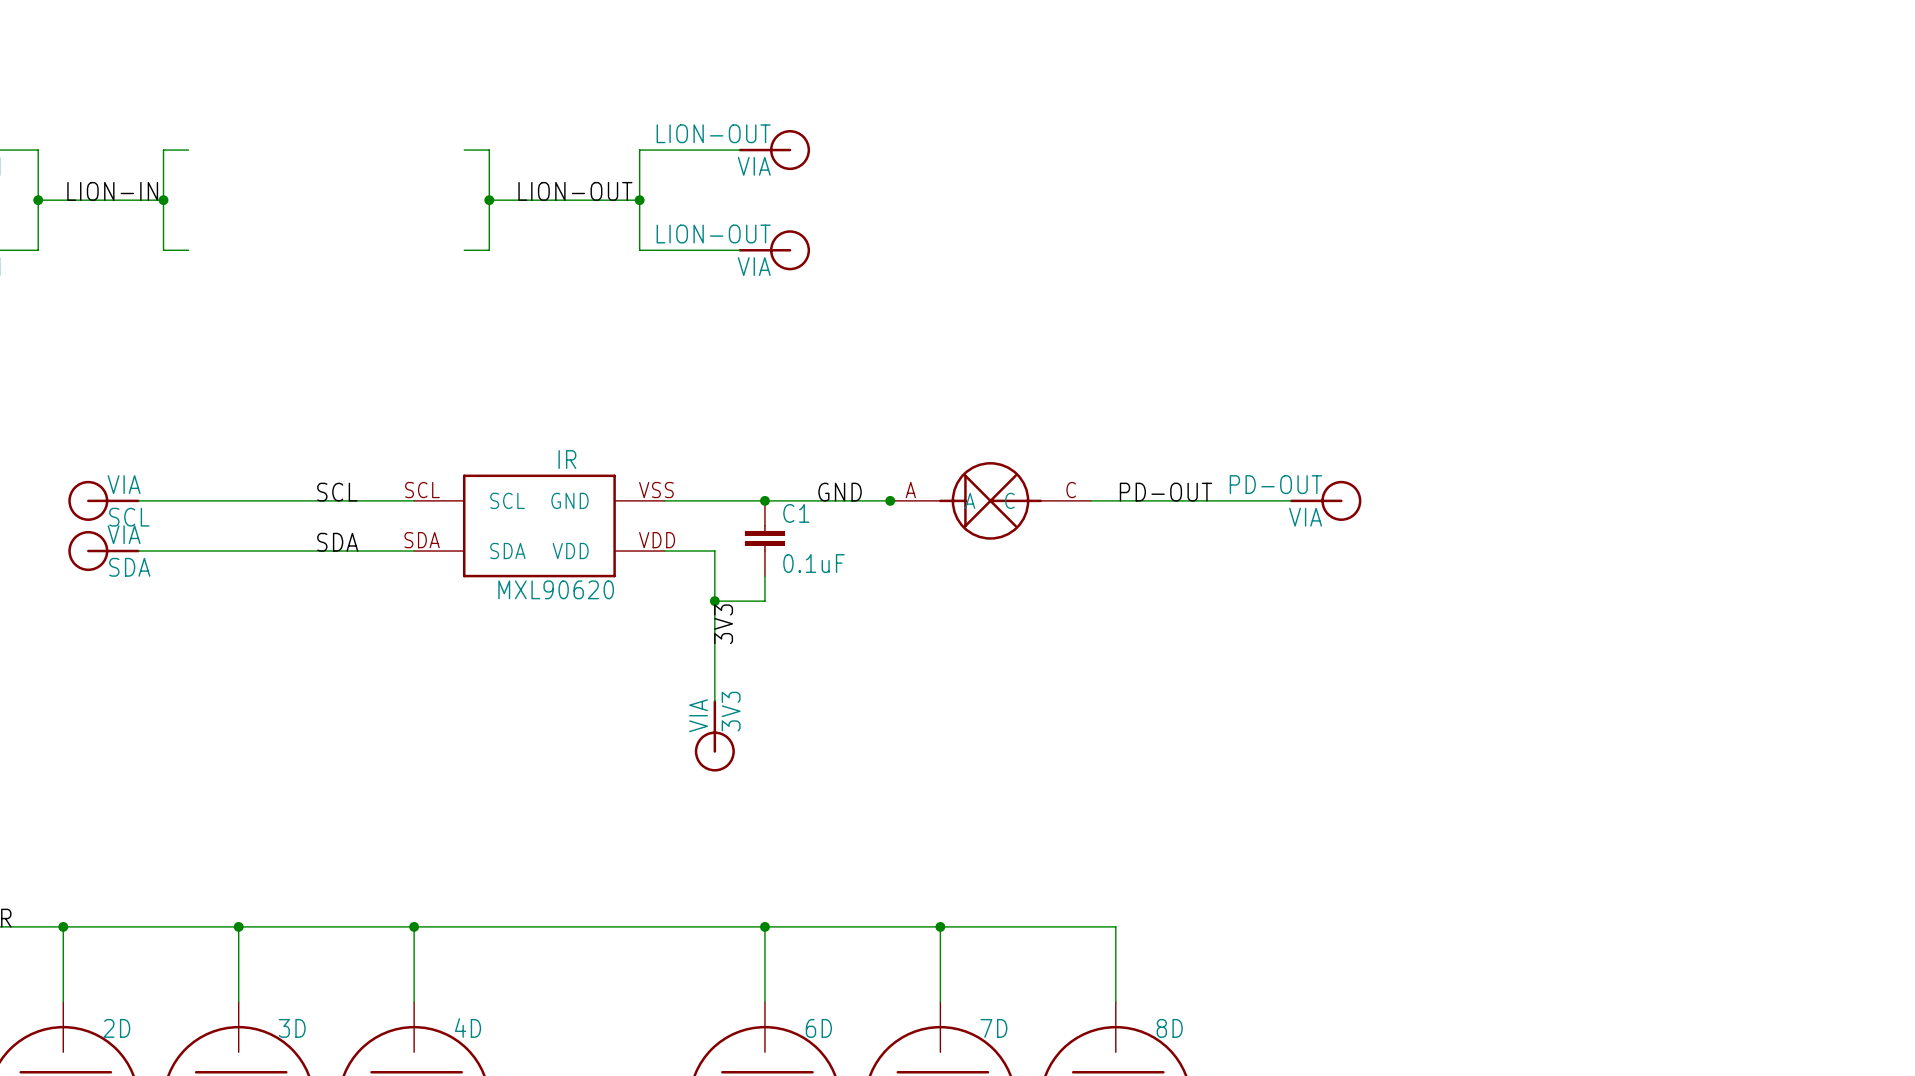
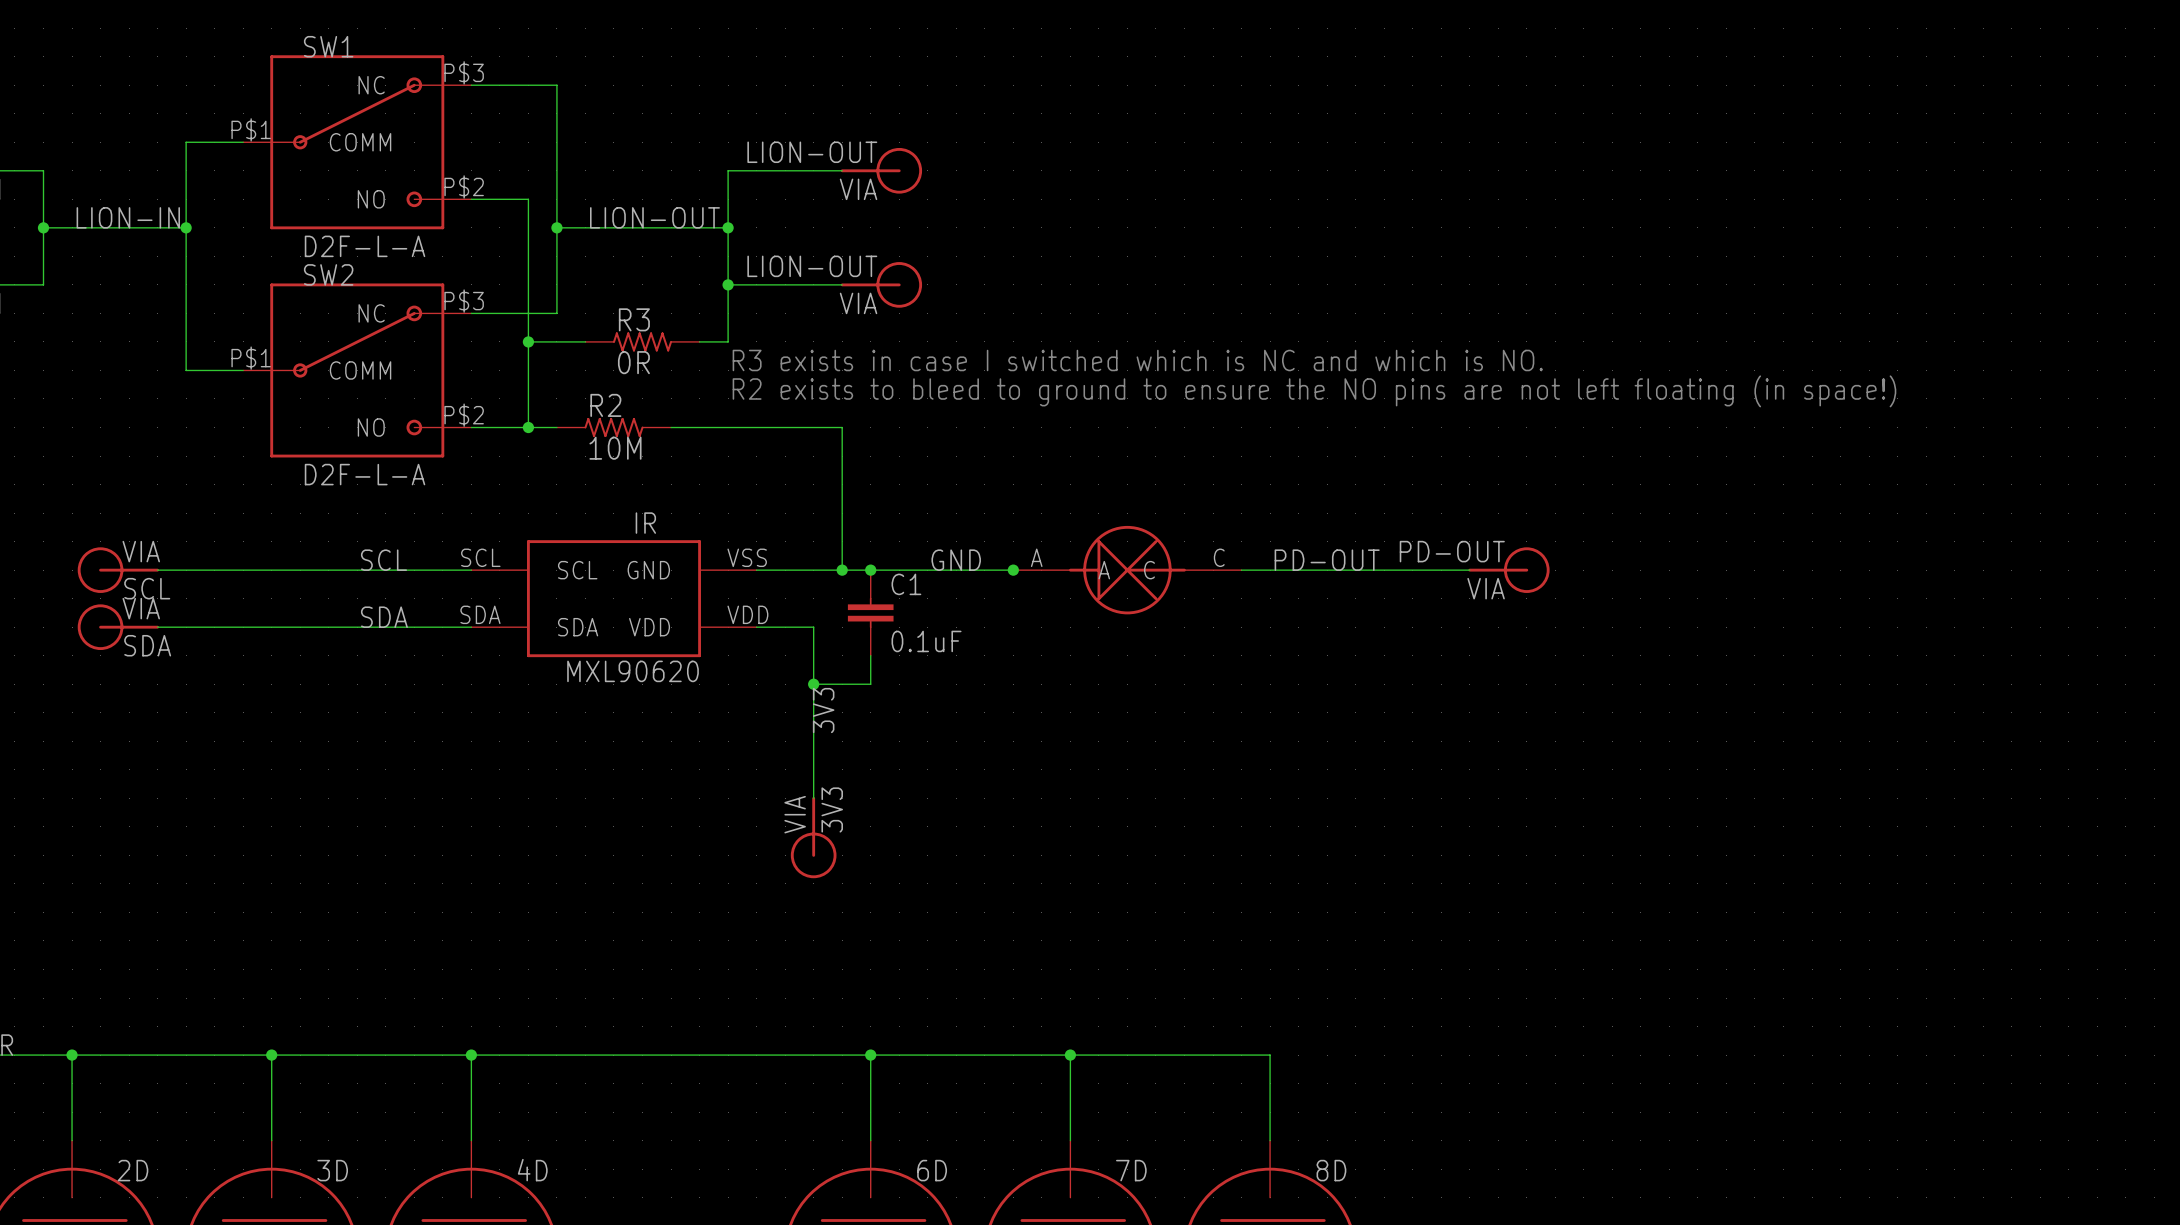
SW1: none -> D2F-L-A (357, 142)
wire: (163, 150) (188, 150) -> (186, 170) (186, 142) (243, 142)
wire: (464, 150) (489, 150) -> (471, 85) (556, 85) (556, 170)
wire: none -> (471, 199) (528, 199) (528, 427)
wire: (163, 250) (188, 250) -> (186, 284) (186, 370) (243, 370)
wire: (464, 250) (489, 250) -> (471, 313) (556, 313) (556, 284)
wire: none -> (728, 284) (728, 341) (699, 341)
junction: none -> (728, 284)
wire: none -> (528, 341) (585, 341)
junction: none -> (528, 341)
R3: none -> 0R (642, 341)
text: none -> R3 exists in case I switched which is NC and which is NO. (1137, 360)
SW2: none -> D2F-L-A (357, 370)
text: none -> R2 exists to bleed to ground to ensure the NO pins are not left floating (in space!) (1314, 391)
wire: none -> (471, 427) (556, 427)
junction: none -> (528, 427)
R2: none -> 10M (613, 427)
wire: none -> (671, 427) (842, 427) (842, 570)
junction: none -> (842, 570)

